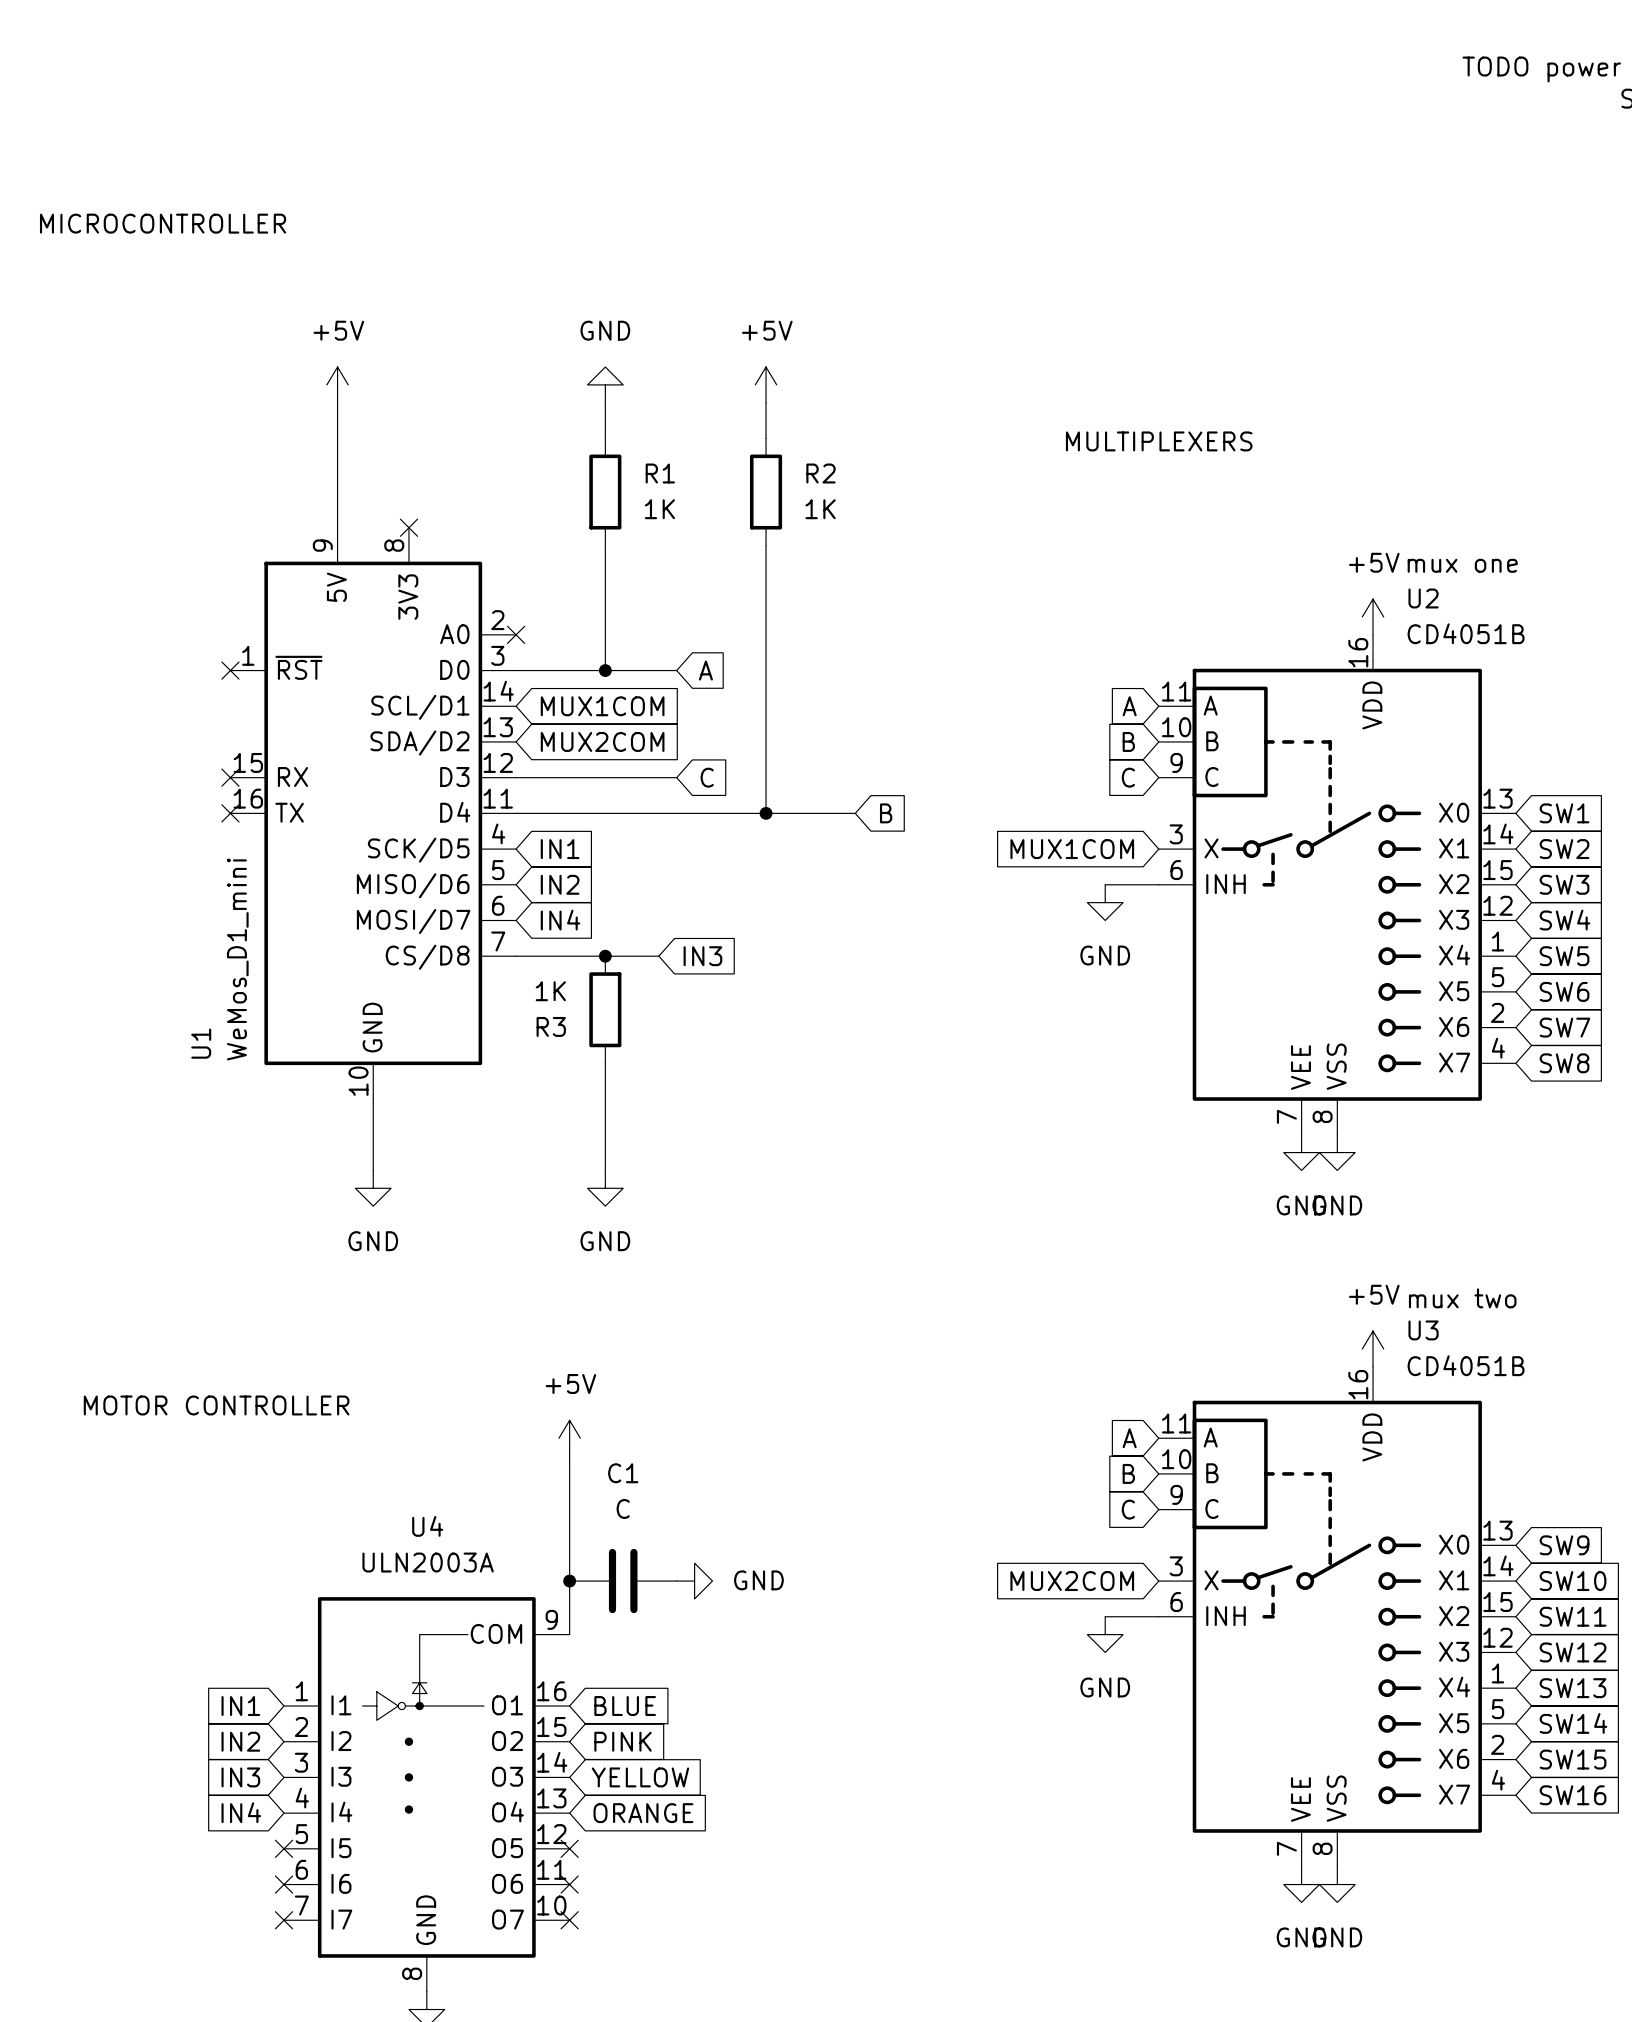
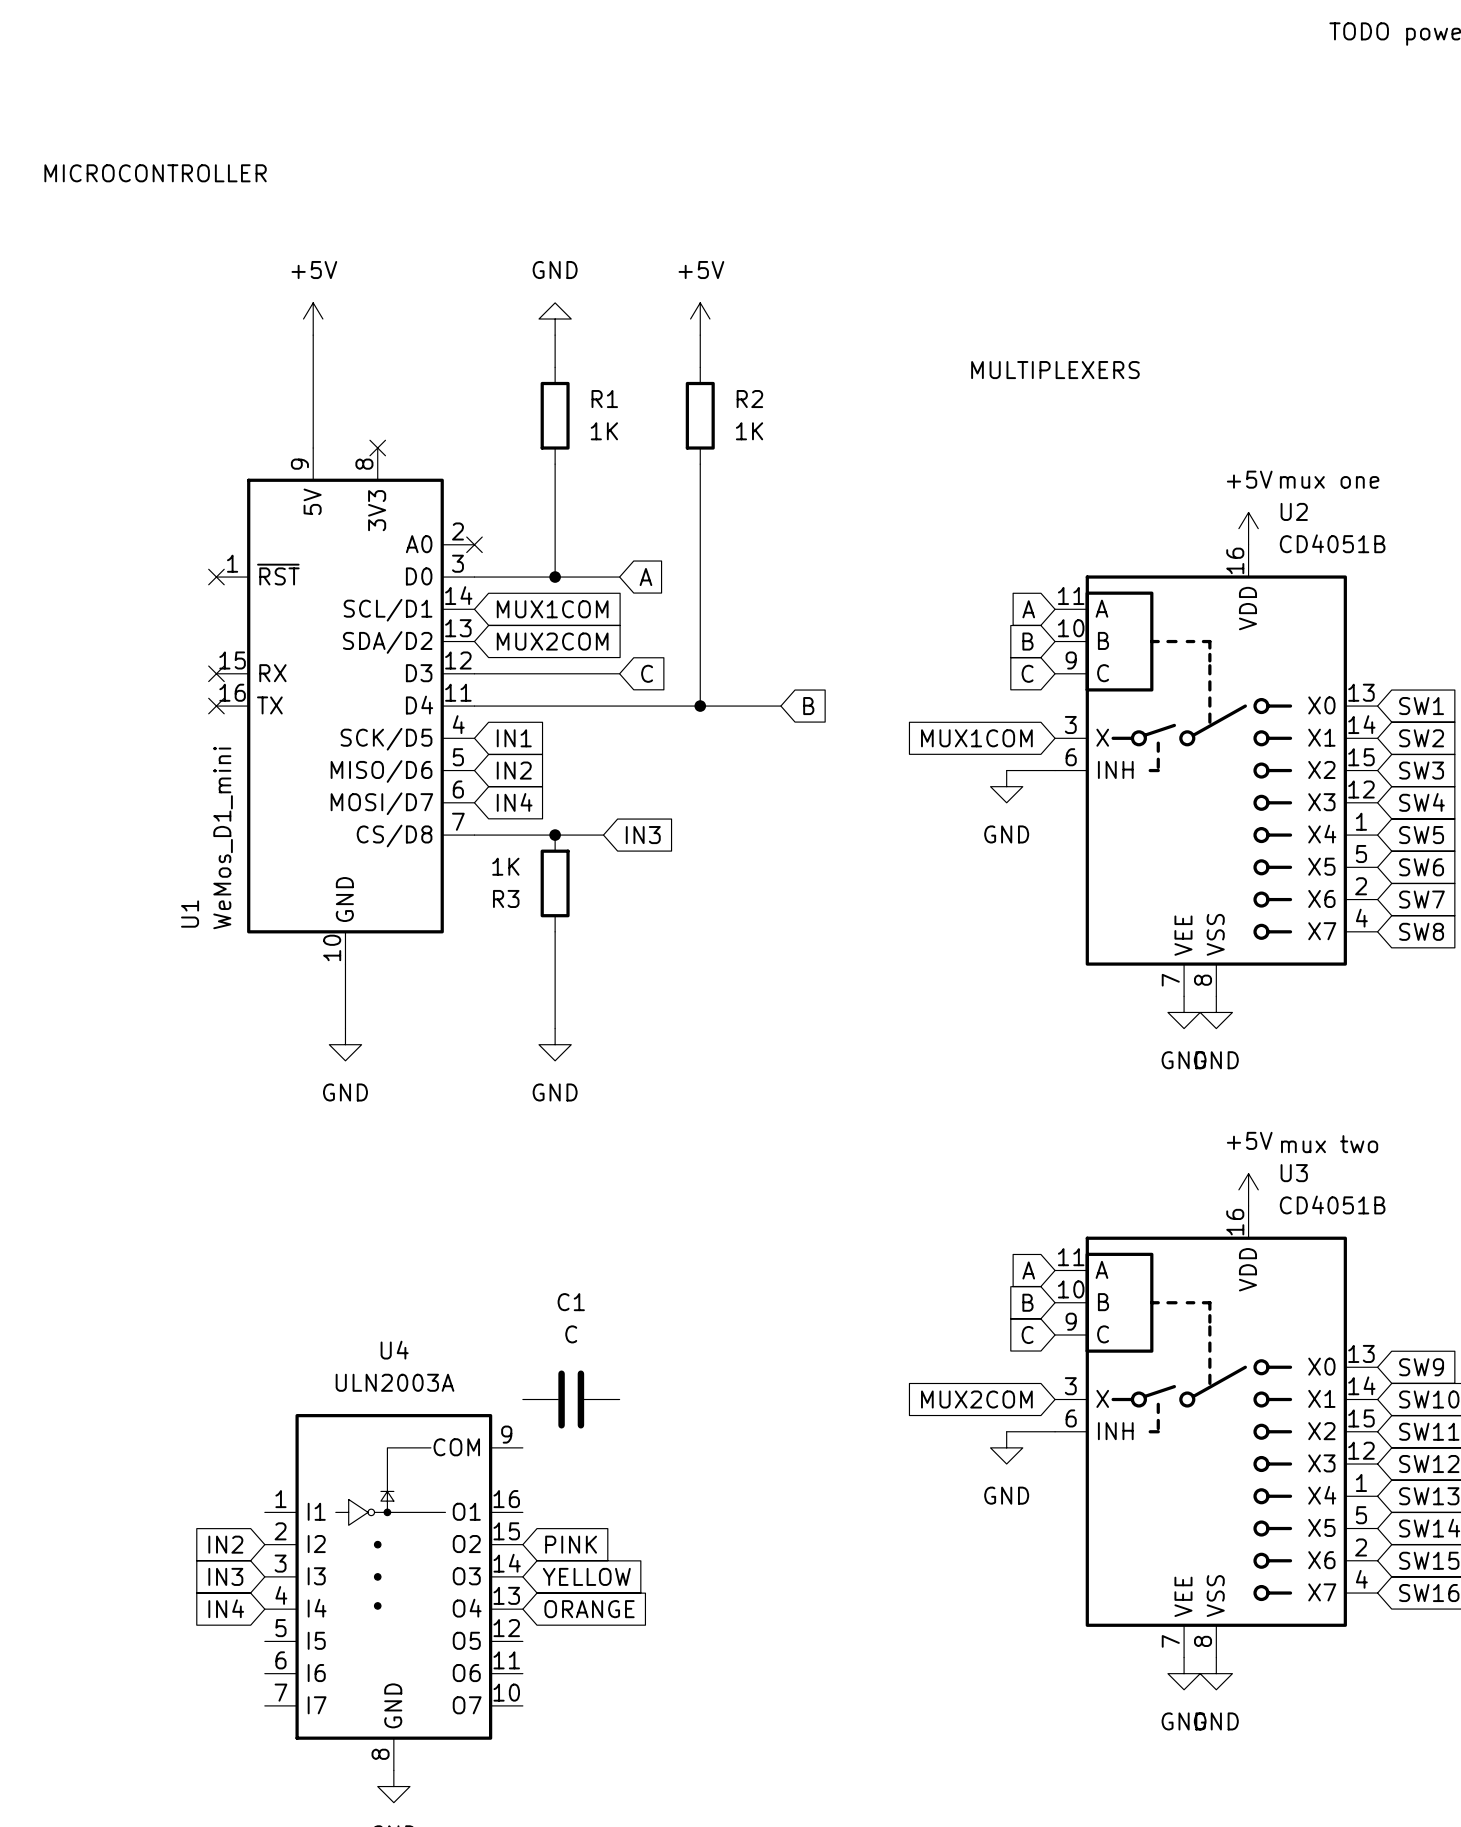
text: MOTOR CONTROLLER (216, 1405) -> none
power symbol: +5V (569, 1438) -> none
wire: (569, 1456) (569, 1634) -> none
junction: (569, 1581) -> none
power symbol: GND (694, 1581) -> none
global label: IN1 (240, 1706) -> none
global label: BLUE (625, 1706) -> none
no-connect mark: (284, 1848) -> none
no-connect mark: (569, 1848) -> none
no-connect mark: (284, 1884) -> none
no-connect mark: (569, 1884) -> none
no-connect mark: (284, 1920) -> none
no-connect mark: (569, 1920) -> none

